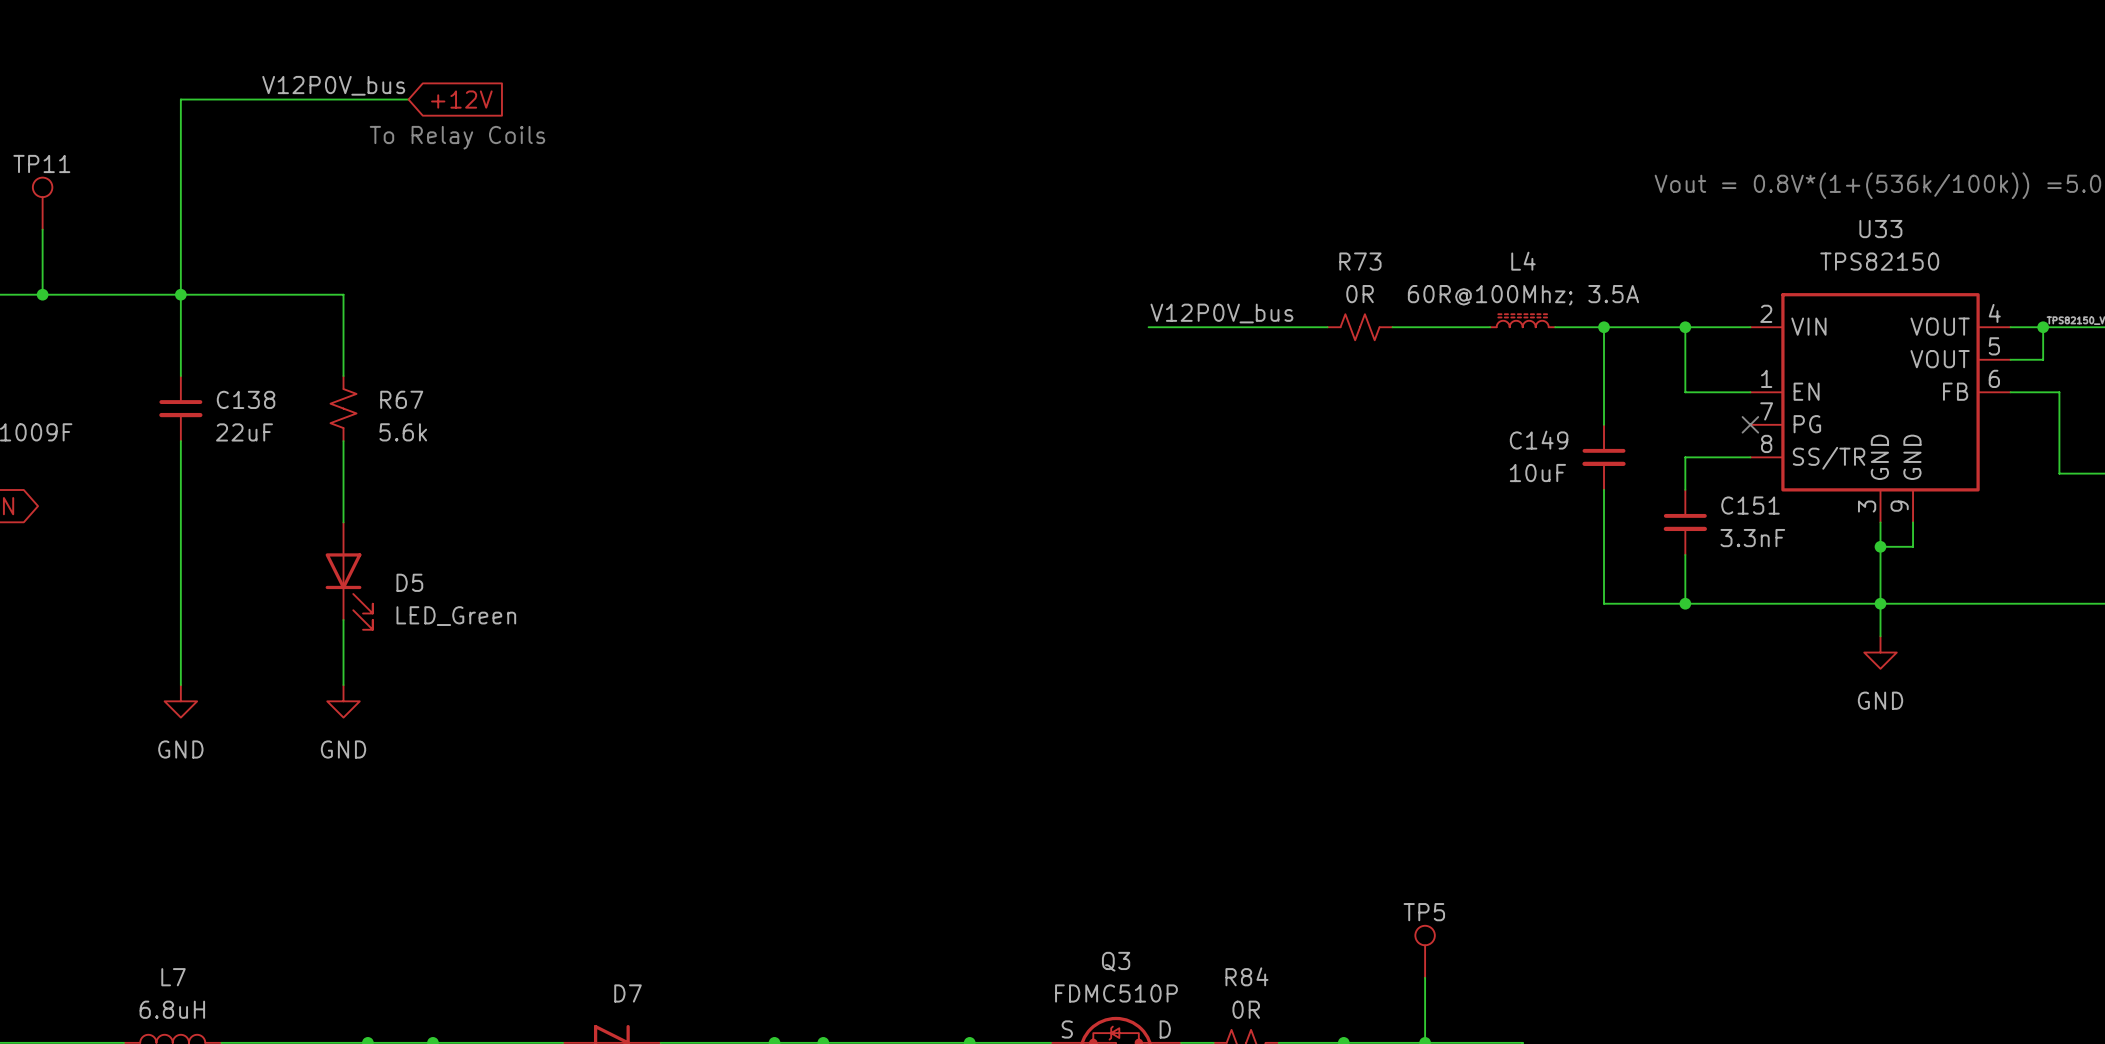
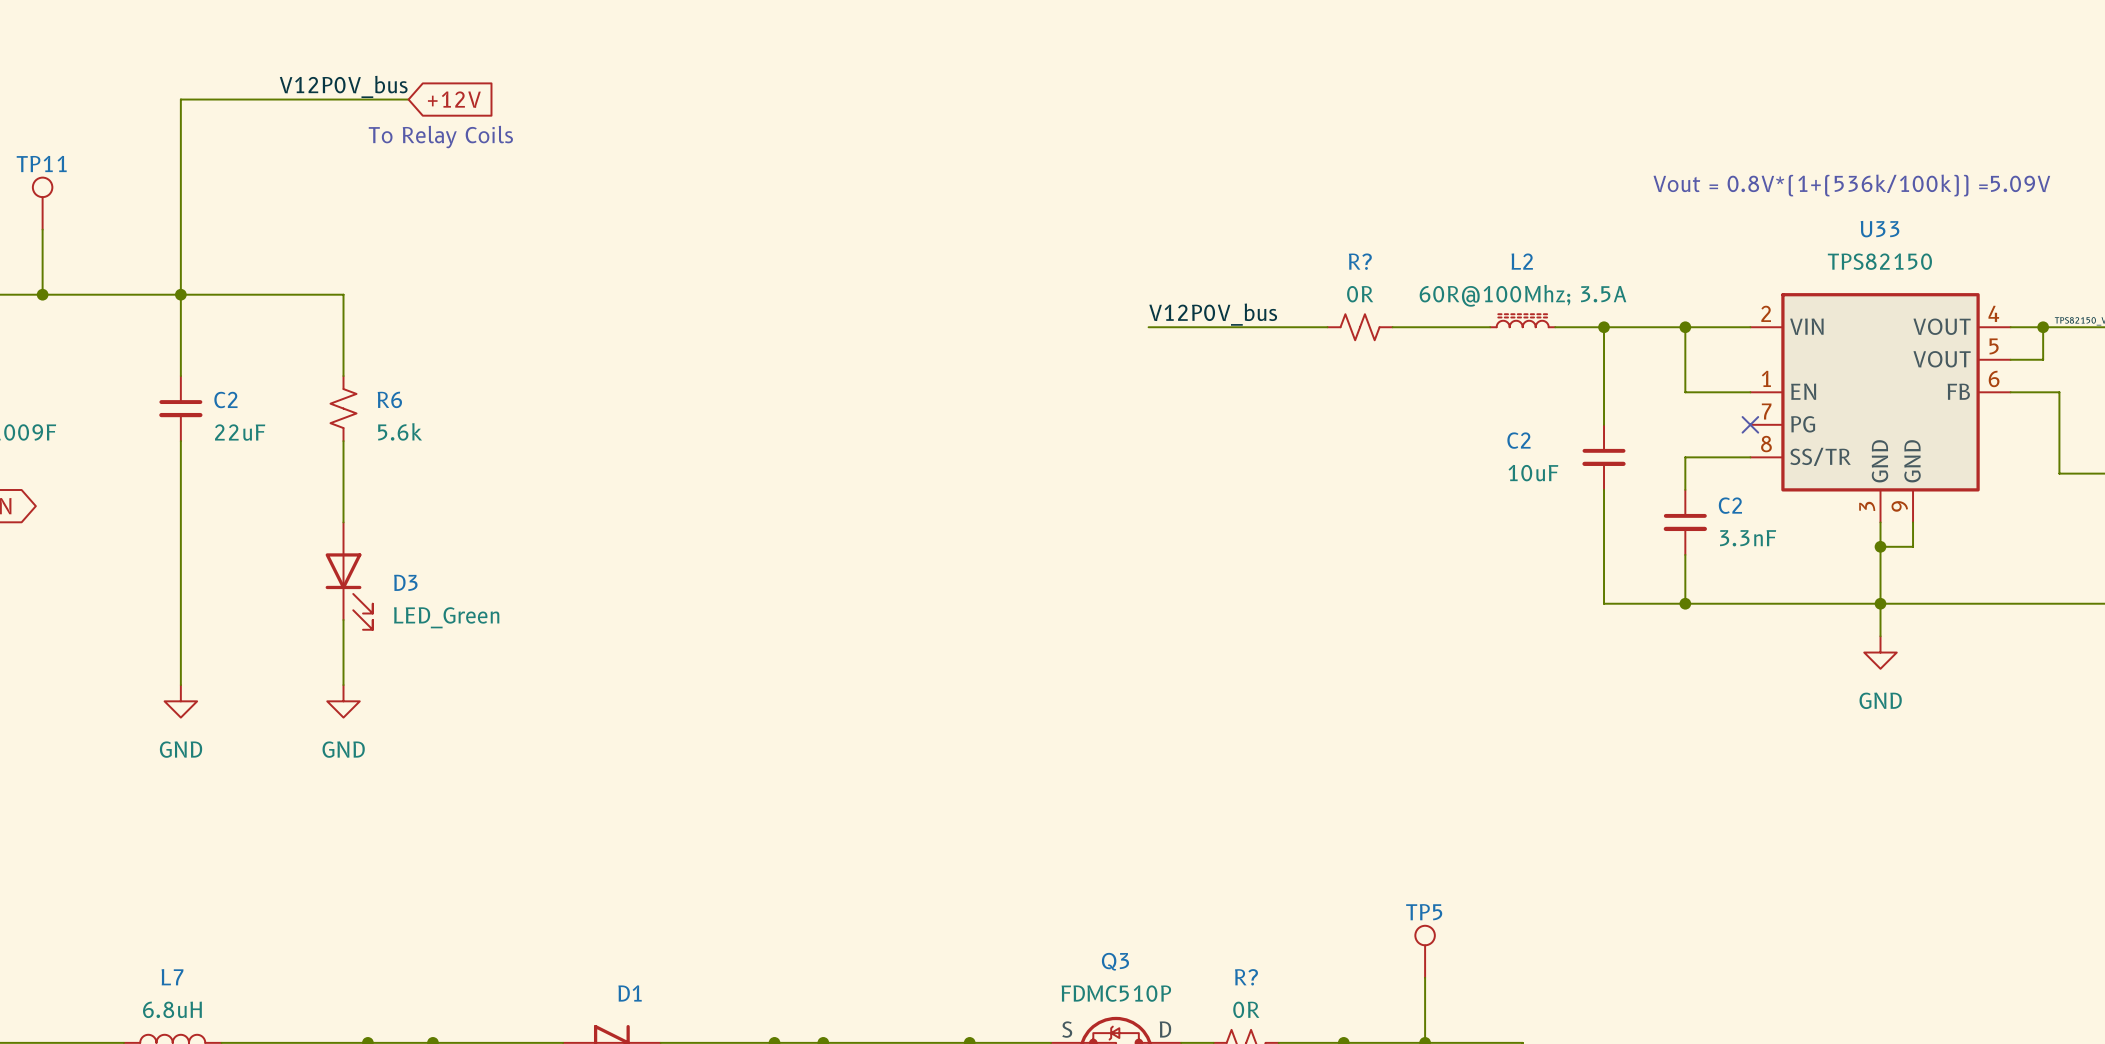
R73 name: R73 (1360, 261) -> R? (1360, 261)
L4 name: L4 (1523, 261) -> L2 (1522, 261)
C138 name: C138 (246, 399) -> C2 (225, 400)
R67 name: R67 (401, 399) -> R6 (389, 399)
C149 name: C149 (1539, 440) -> C2 (1518, 440)
C151 name: C151 (1750, 505) -> C2 (1730, 505)
D5 name: D5 (409, 582) -> D3 (405, 582)
R84 name: R84 (1246, 976) -> R? (1246, 977)
D7 name: D7 (628, 993) -> D1 (630, 993)

